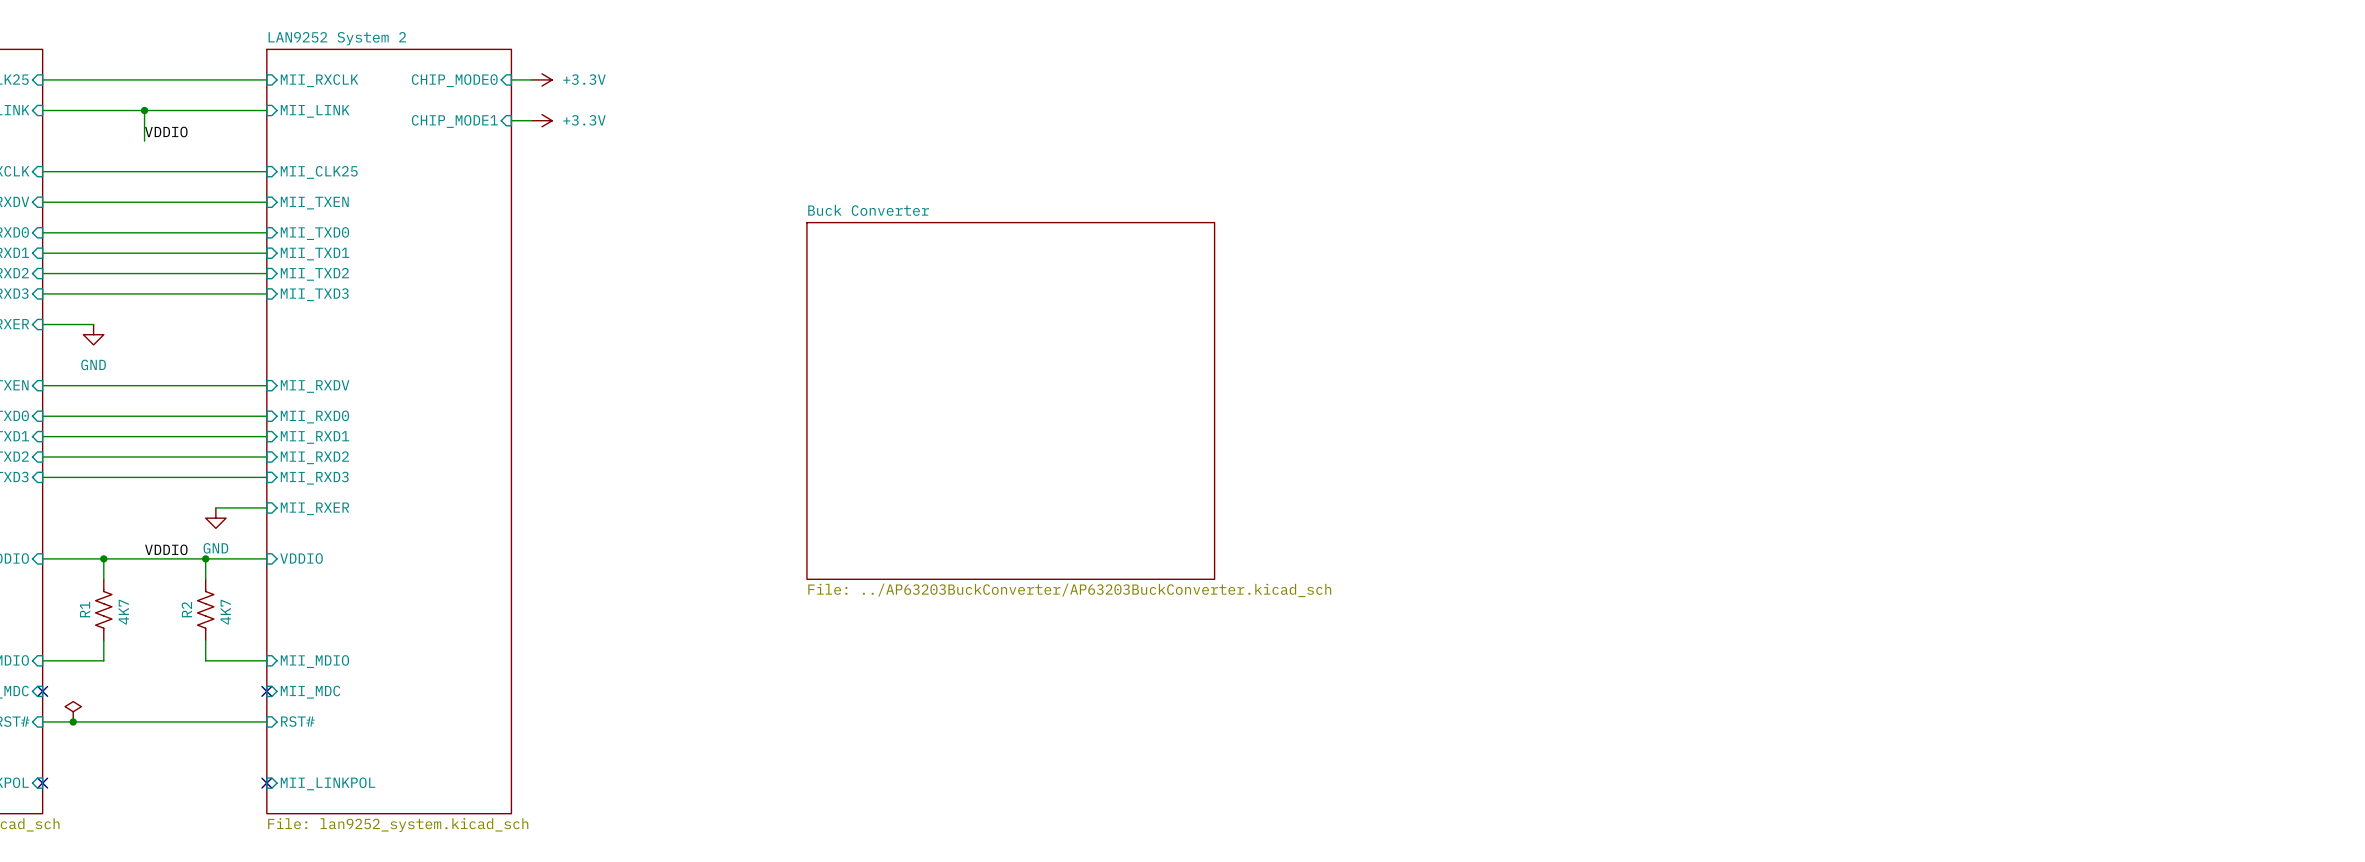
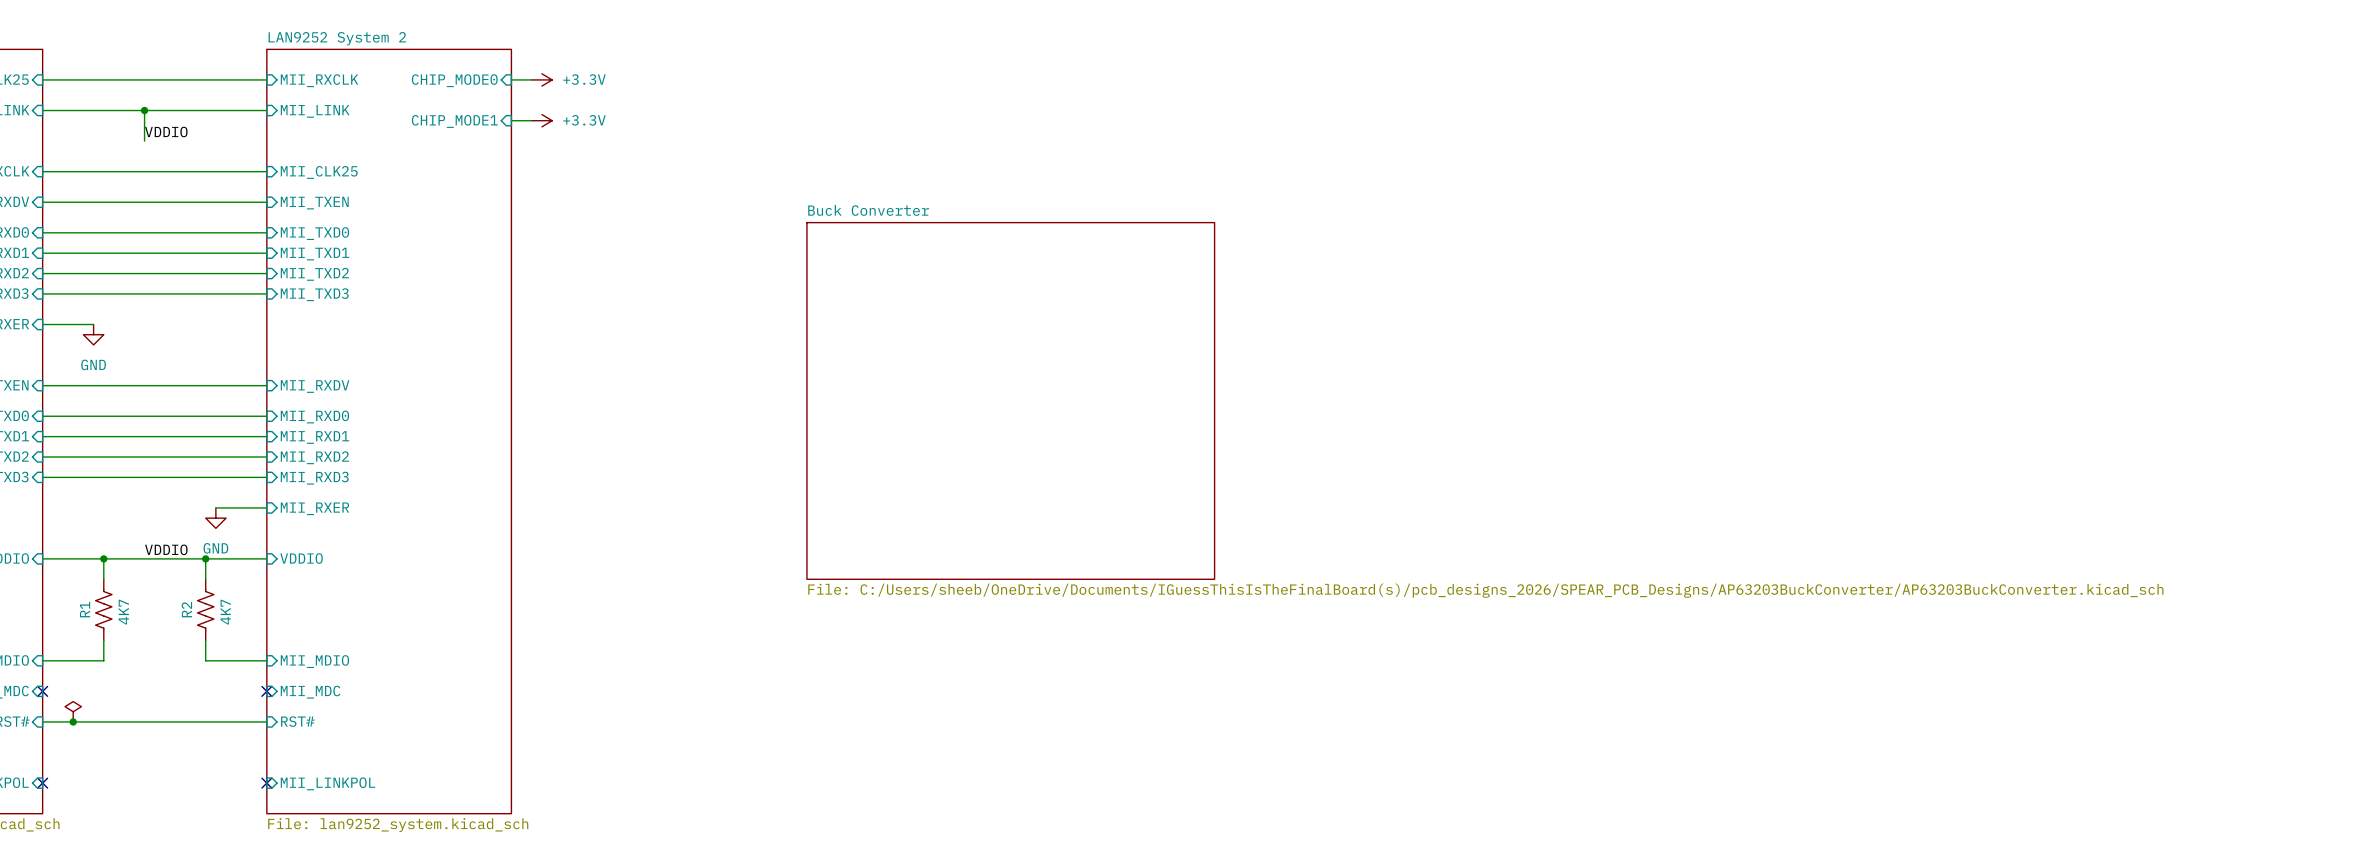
sheet Buck Converter value: File: ../AP63203BuckConverter/AP63203BuckConverter.kicad_sch (1069, 590) -> File: C:/Users/sheeb/OneDrive/Documents/IGuessThisIsTheFinalBoard(s)/pcb_designs_2026/SPEAR_PCB_Designs/AP63203BuckConverter/AP63203BuckConverter.kicad_sch (1485, 590)

